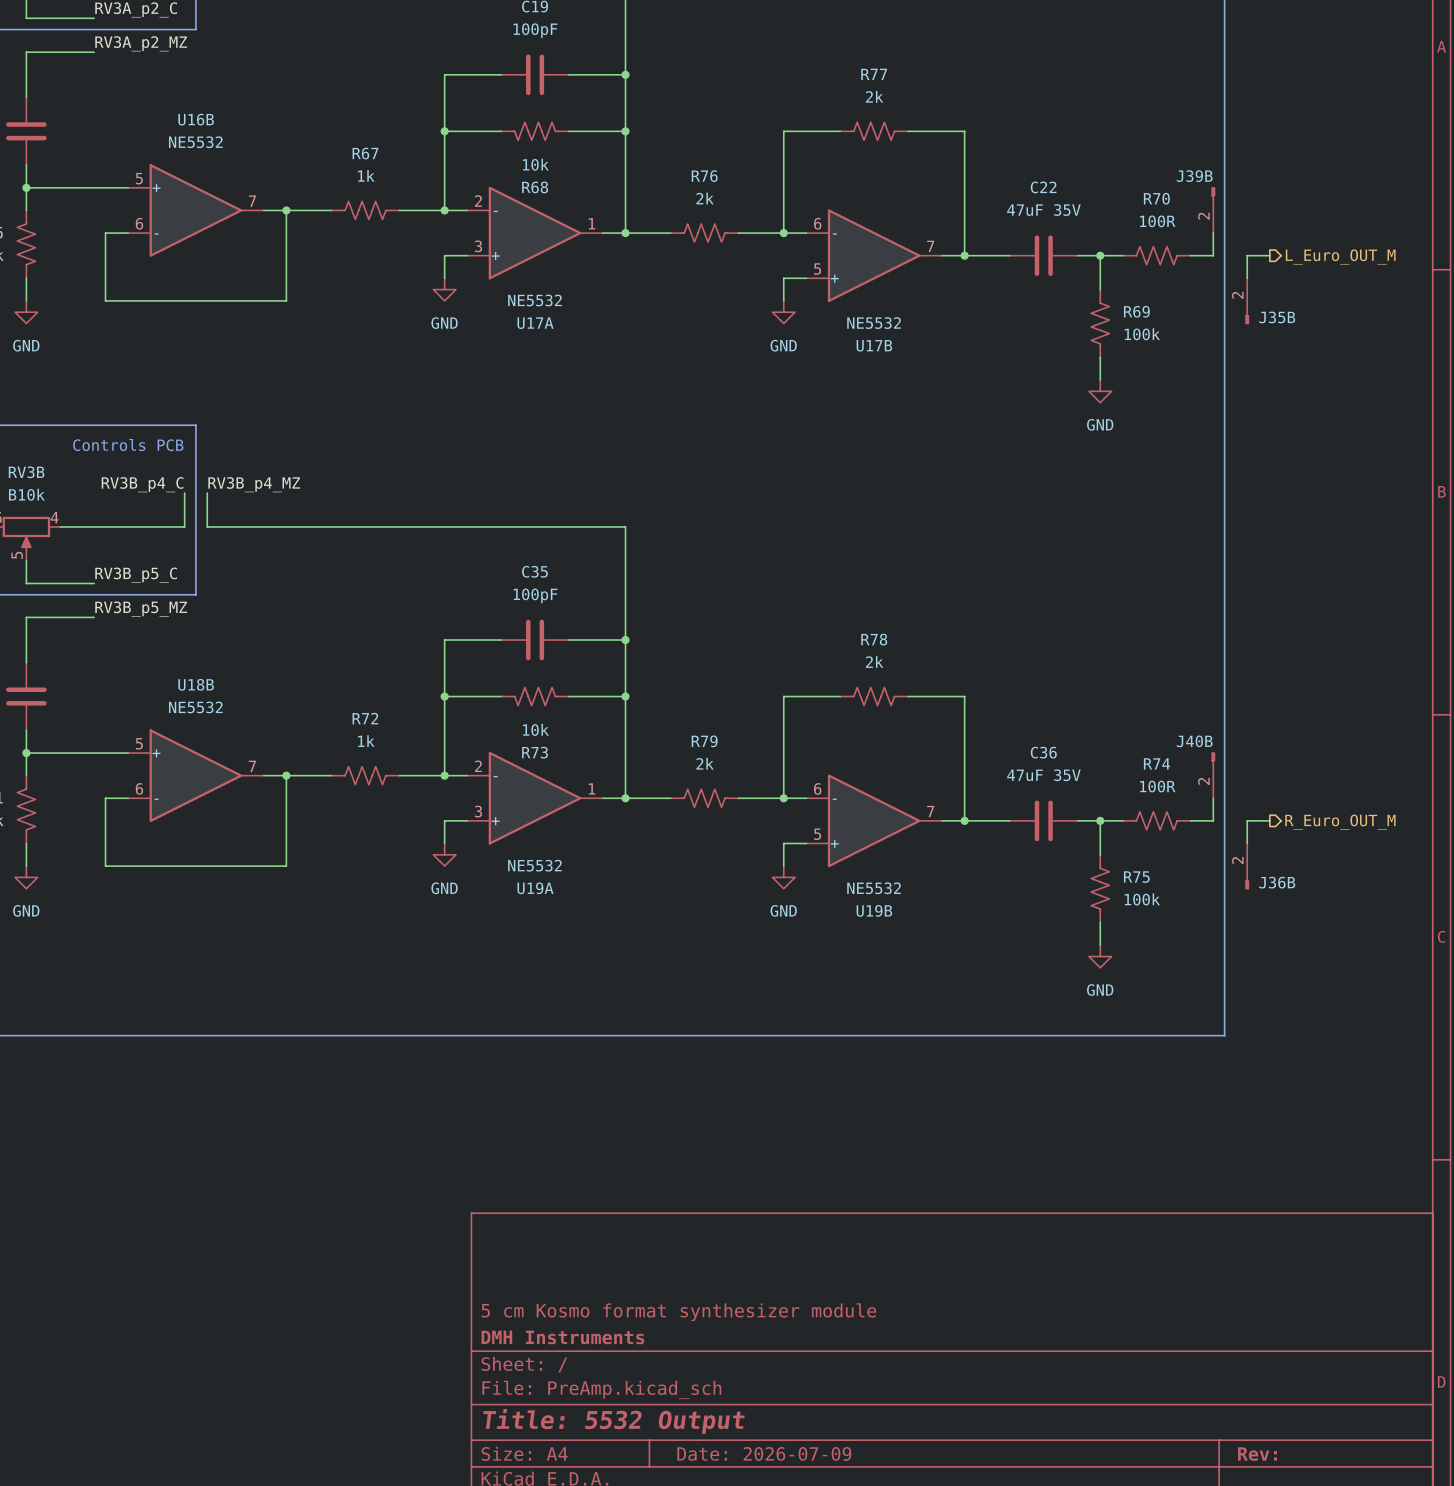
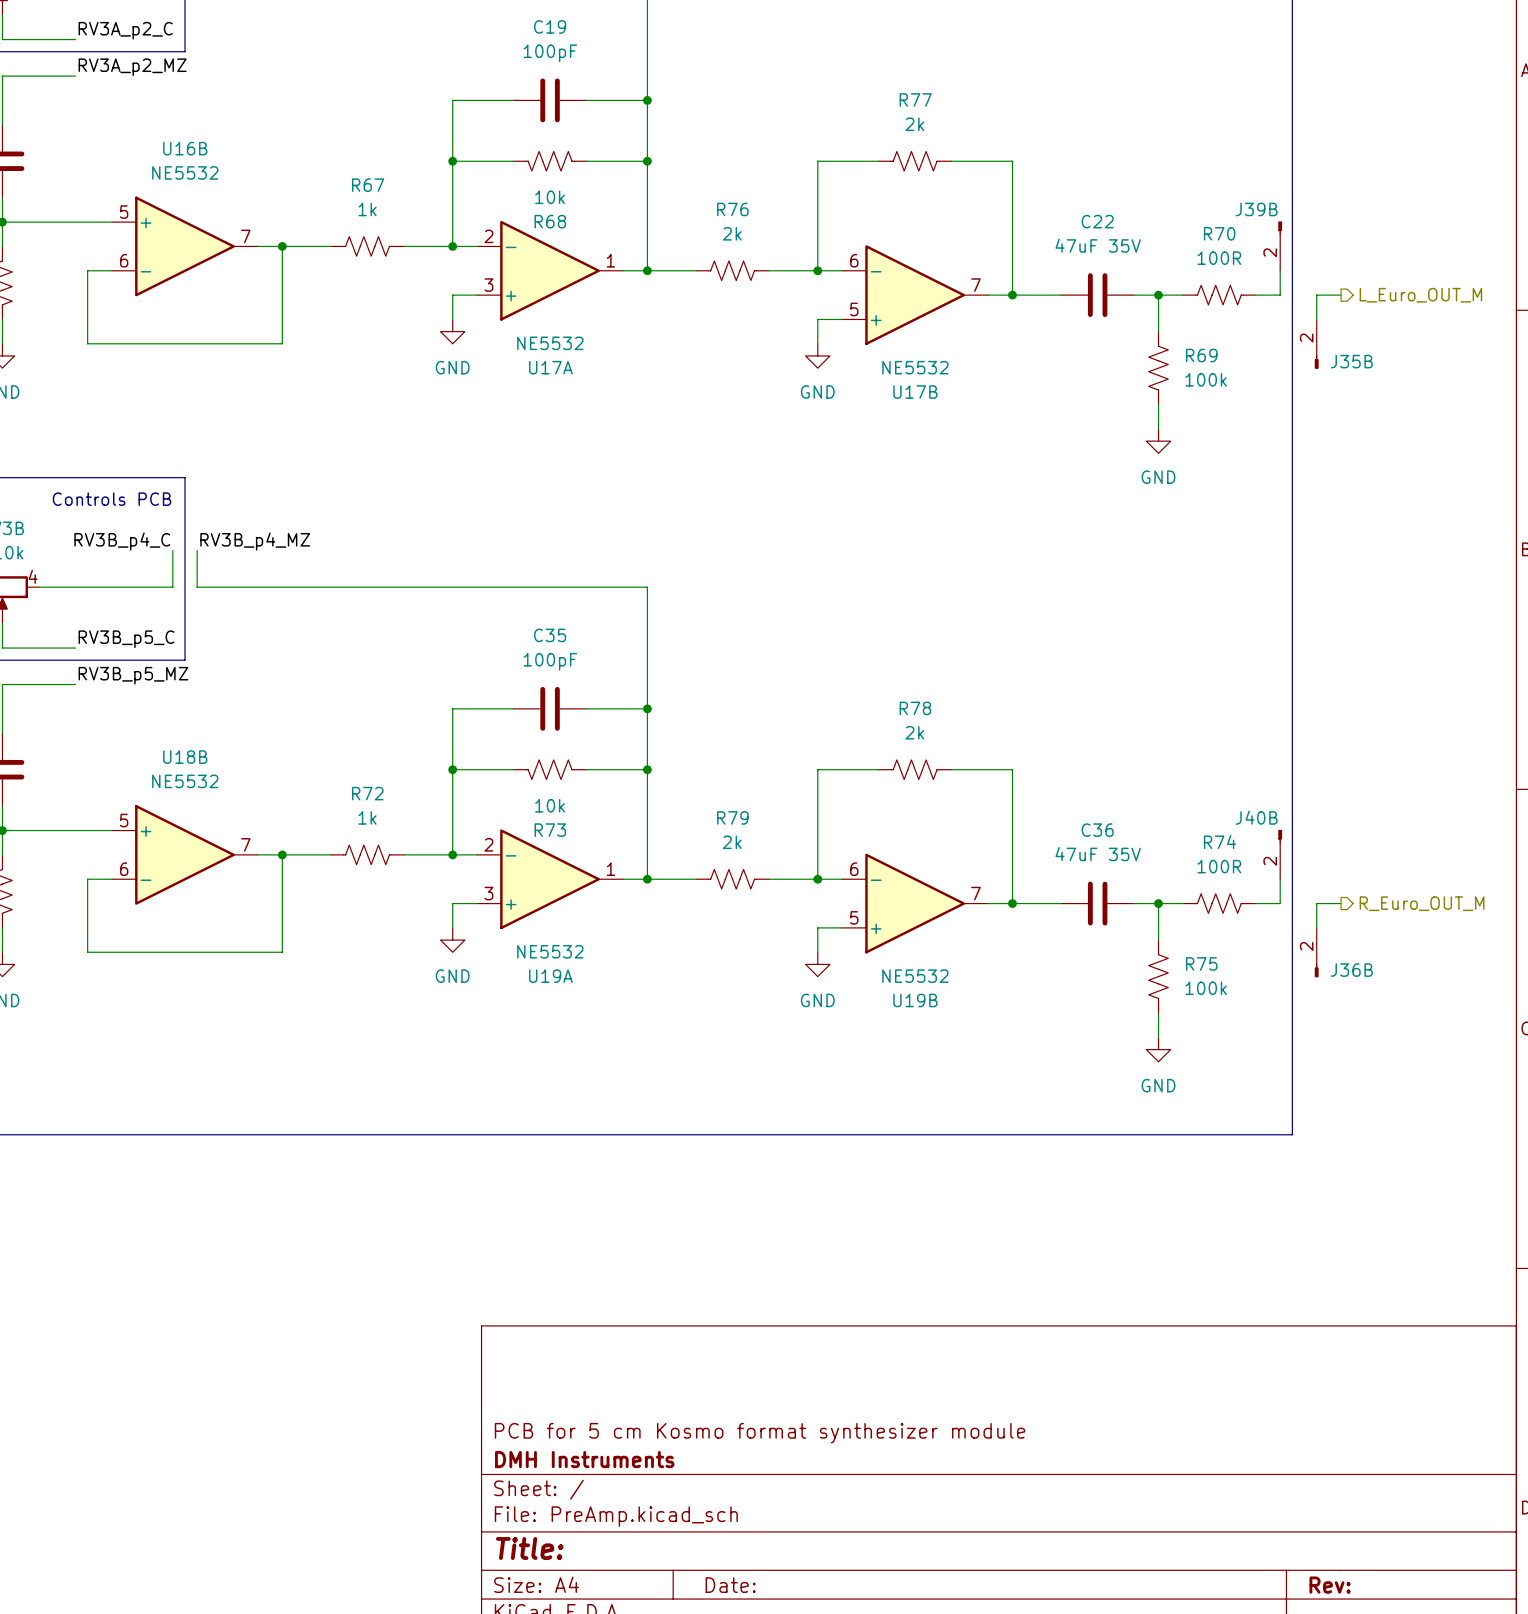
title block: 5 cm Kosmo format synthesizer module (678, 1312) -> PCB for 5 cm Kosmo format synthesizer module (760, 1433)
title block: Title: 5532 Output (613, 1421) -> Title: (529, 1548)
title block: Date: 2026-07-09 (764, 1453) -> Date: (730, 1585)

